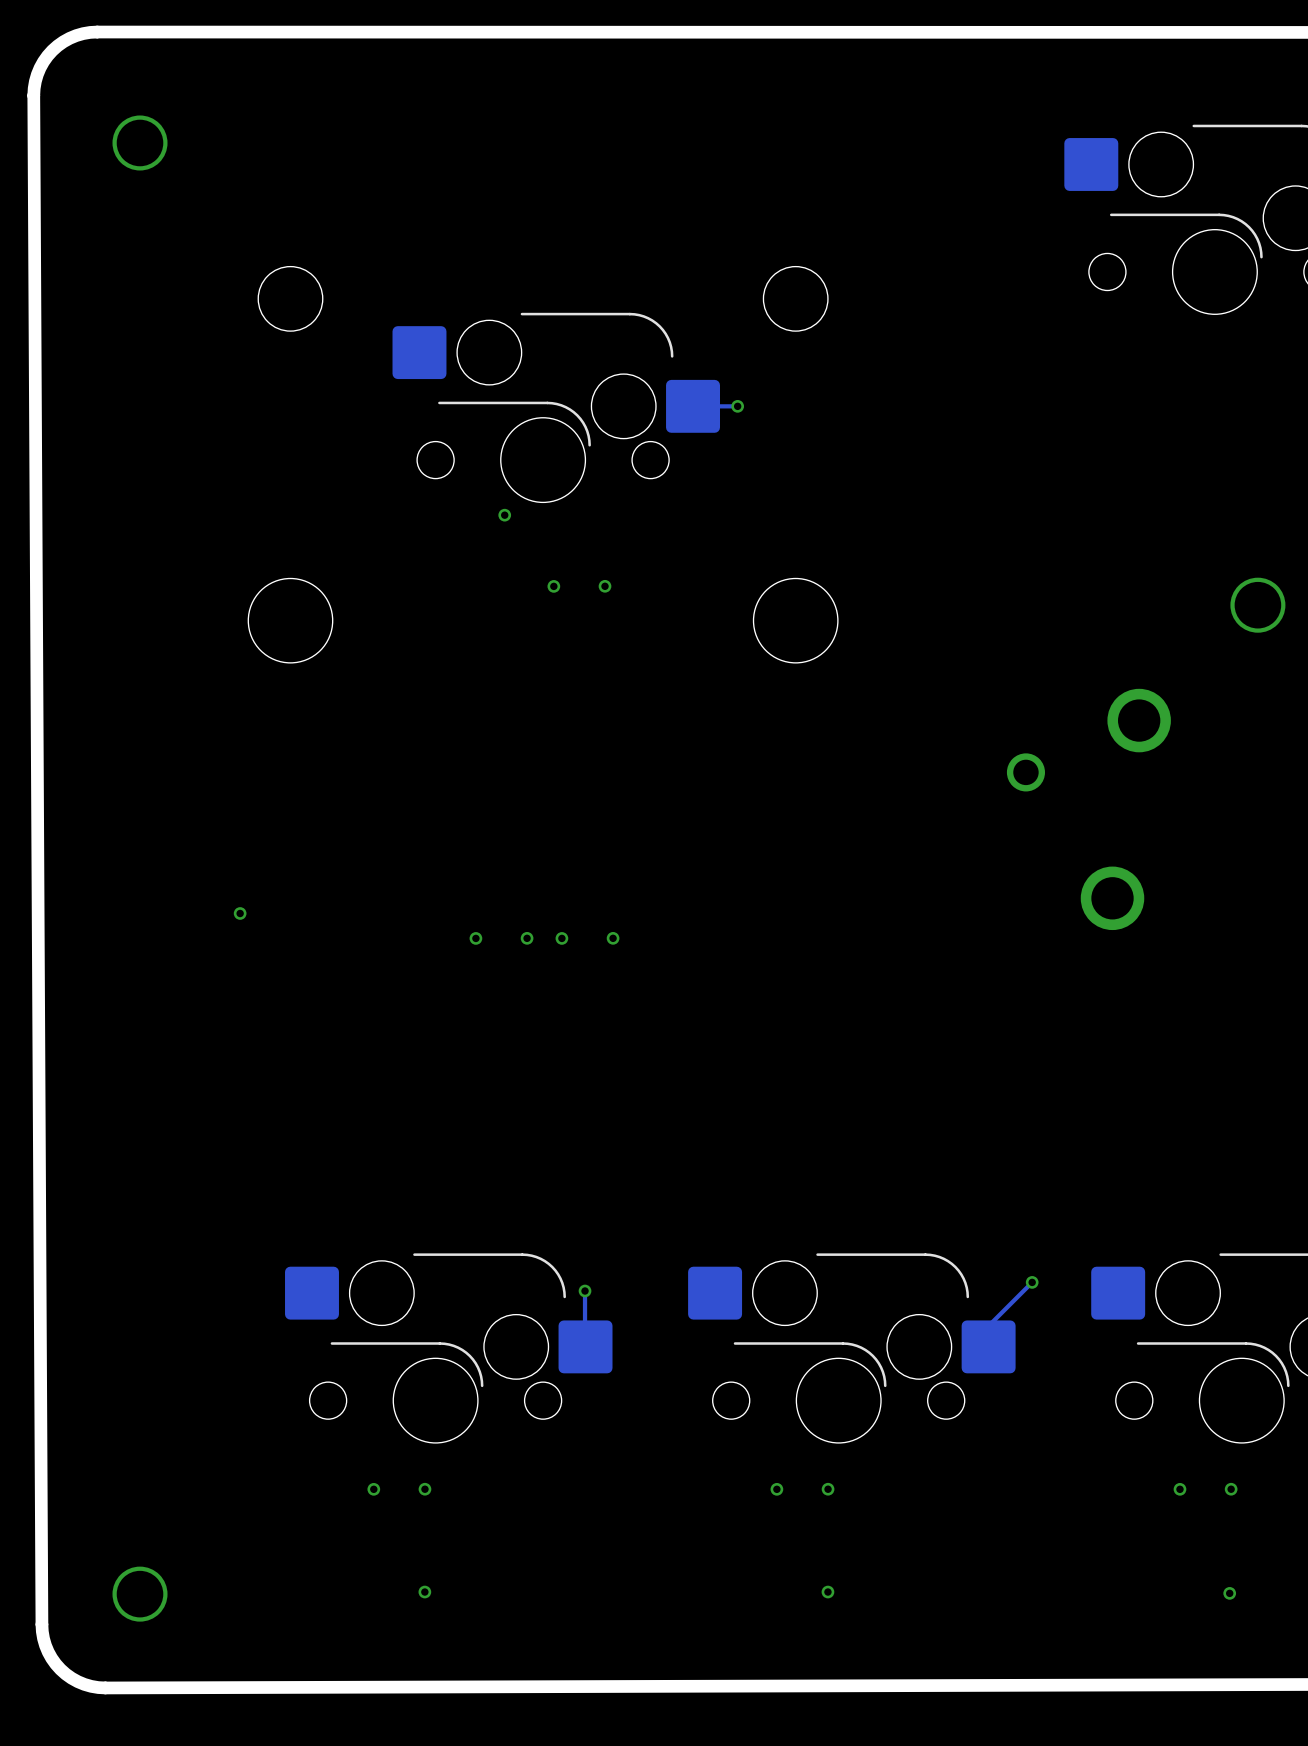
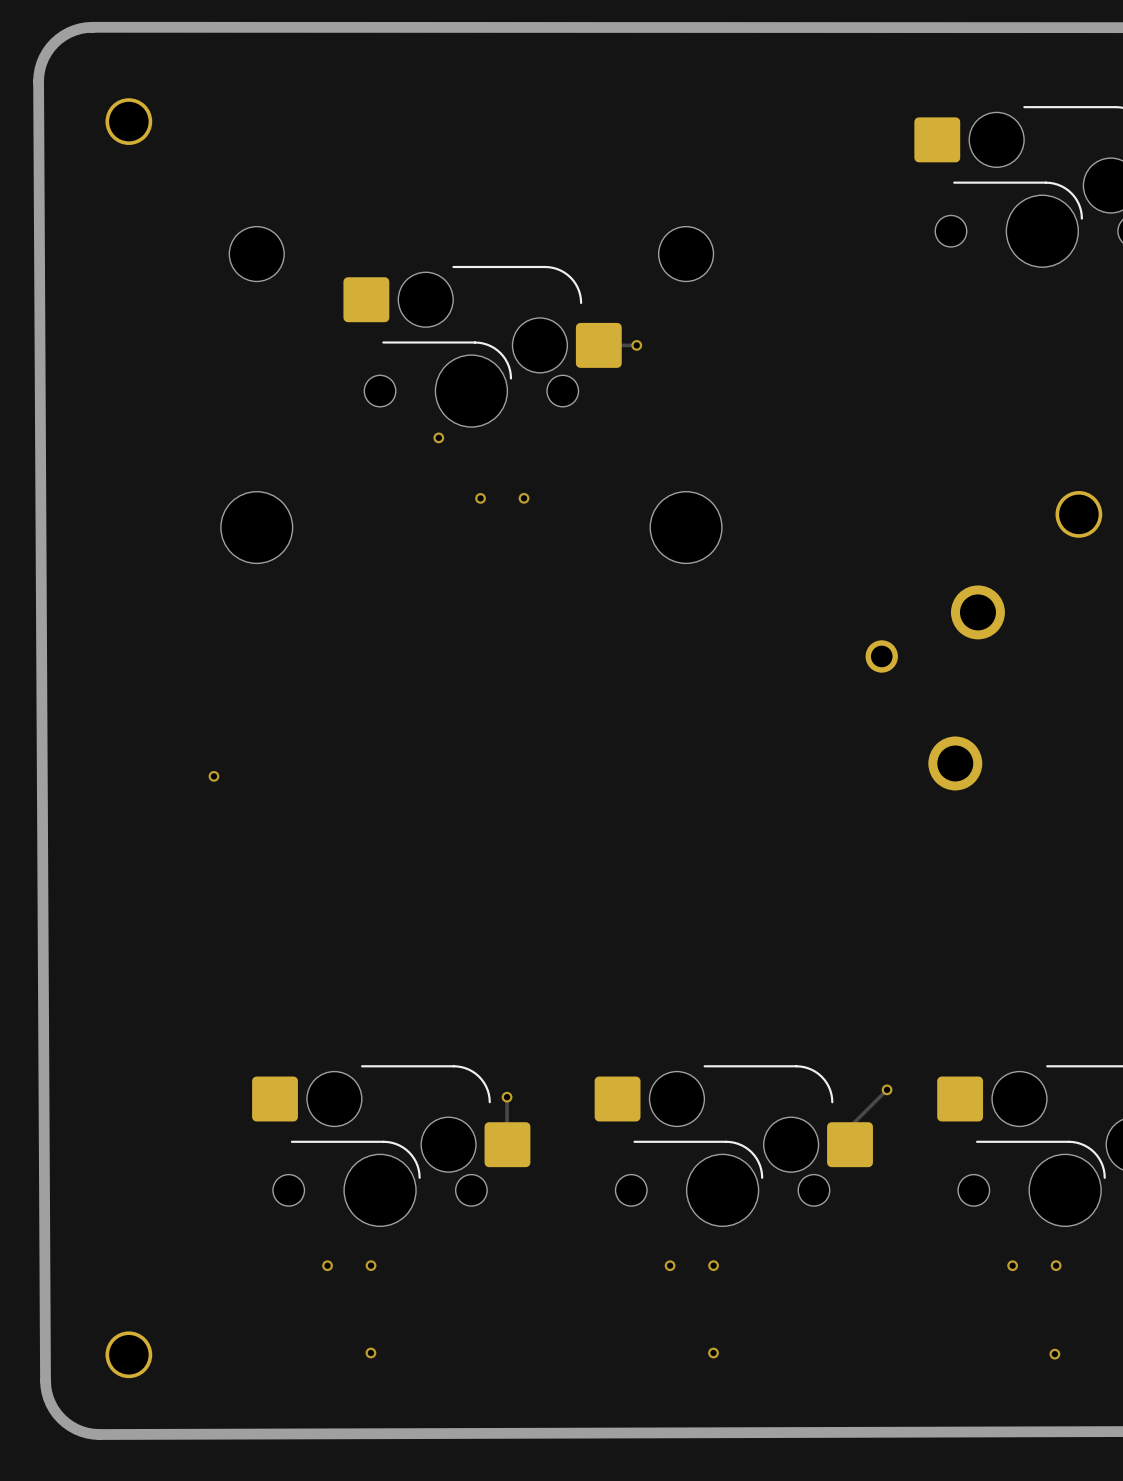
via: (475, 938) -> none
via: (527, 938) -> none
via: (561, 938) -> none
via: (613, 938) -> none

